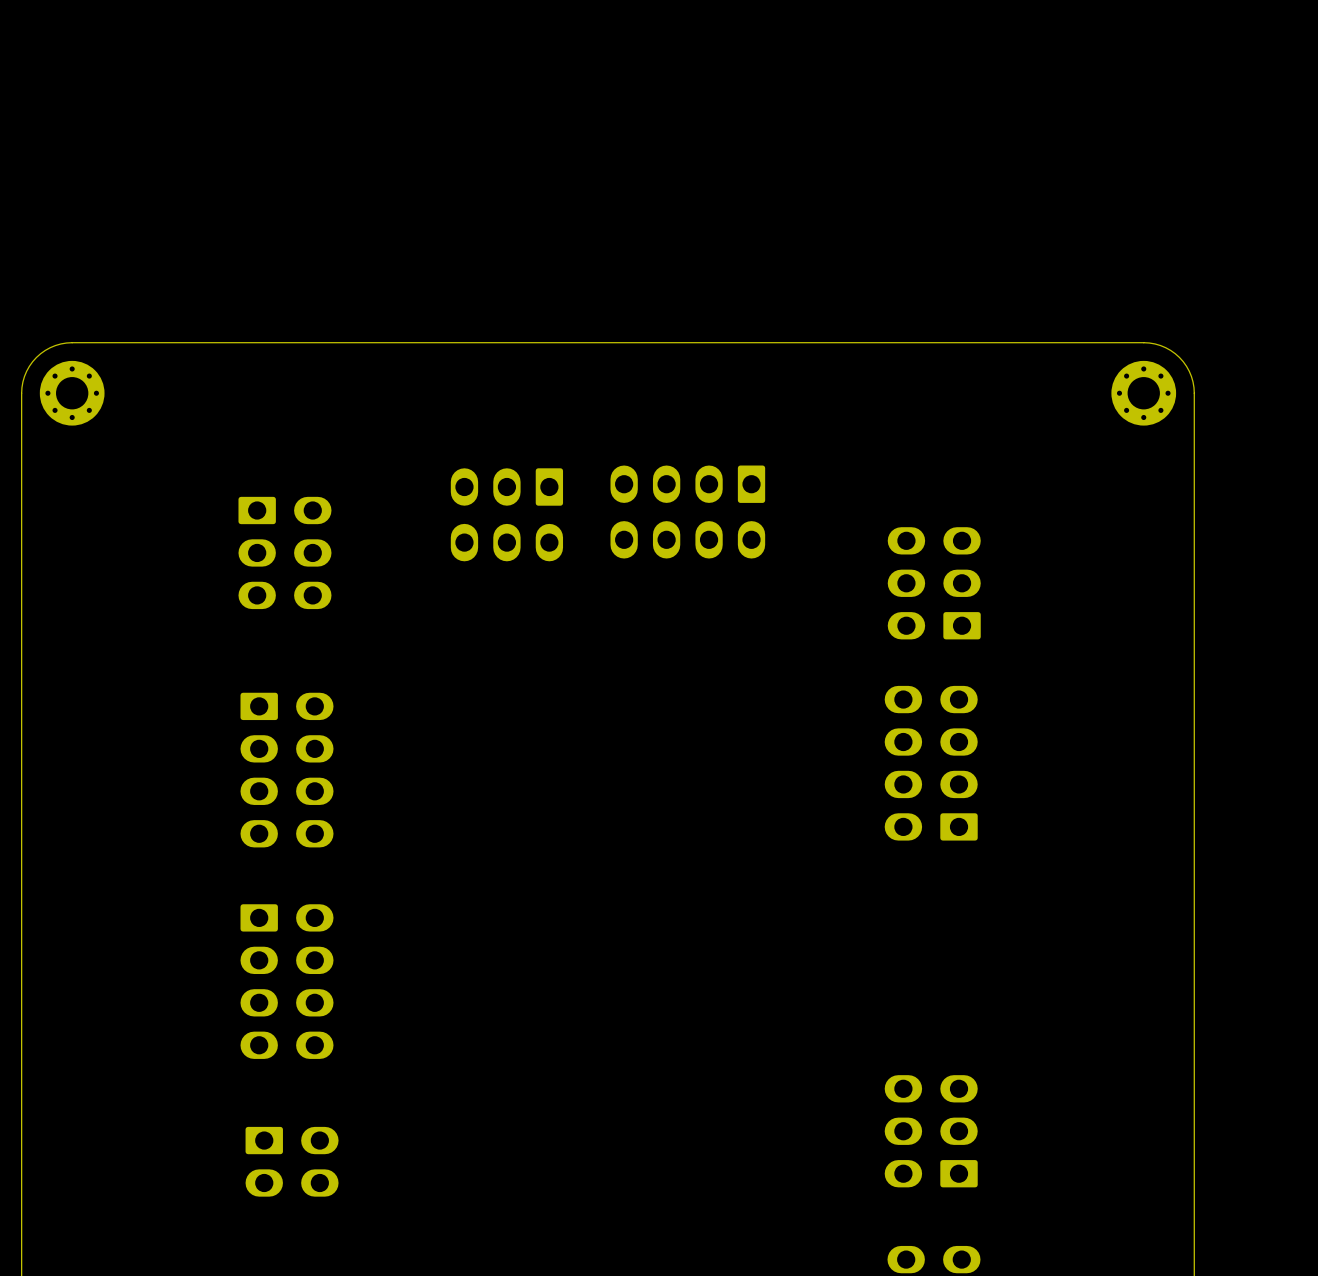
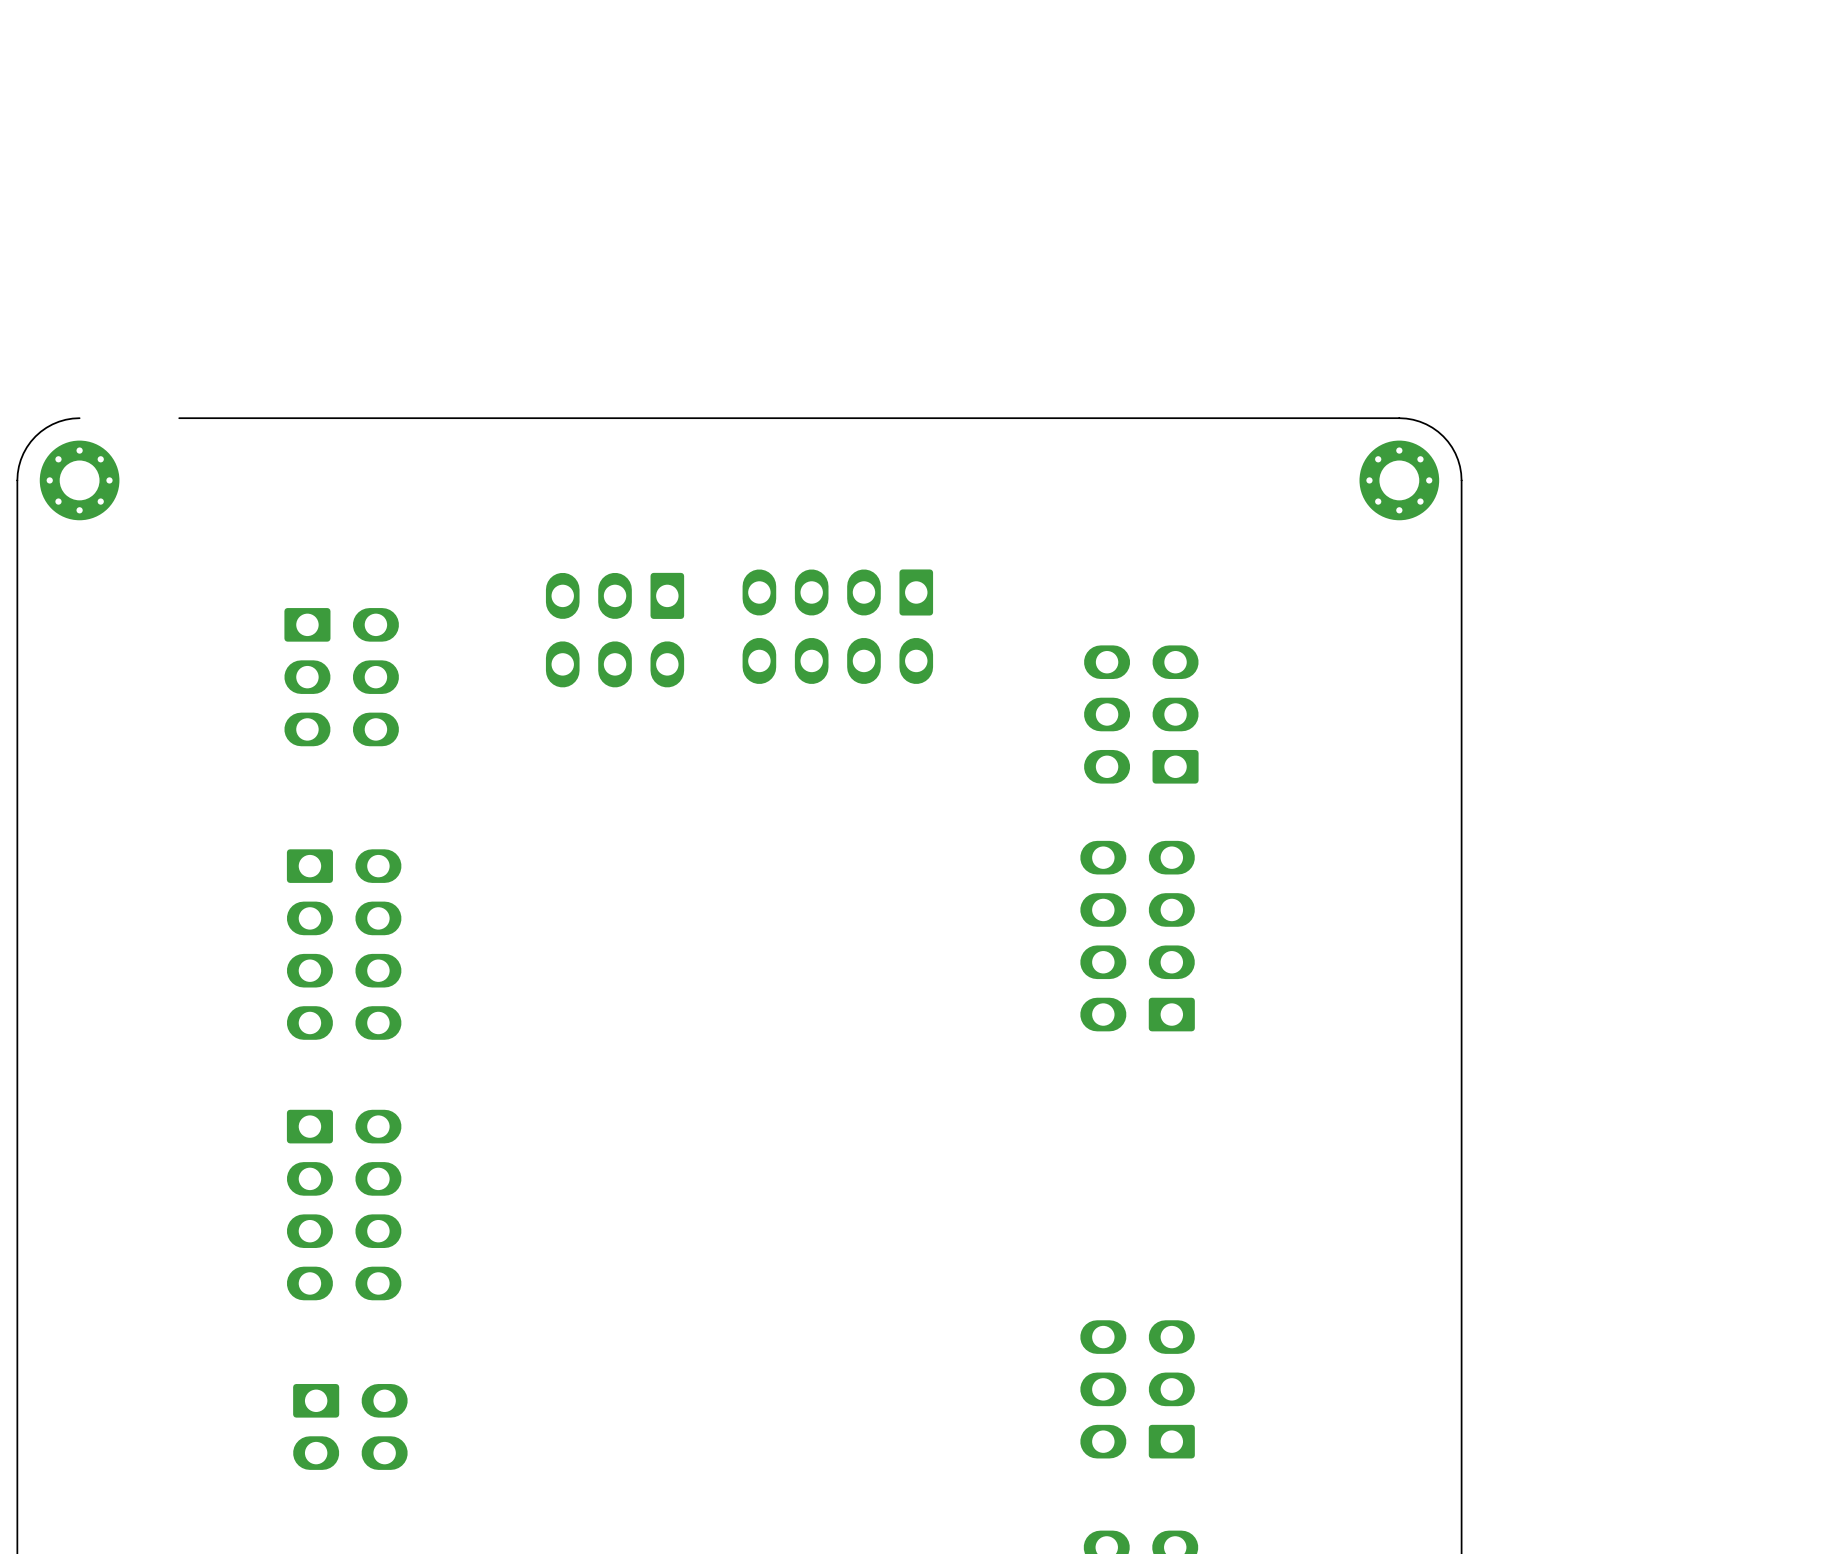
board edge: (153, 342) (72, 342) -> none

